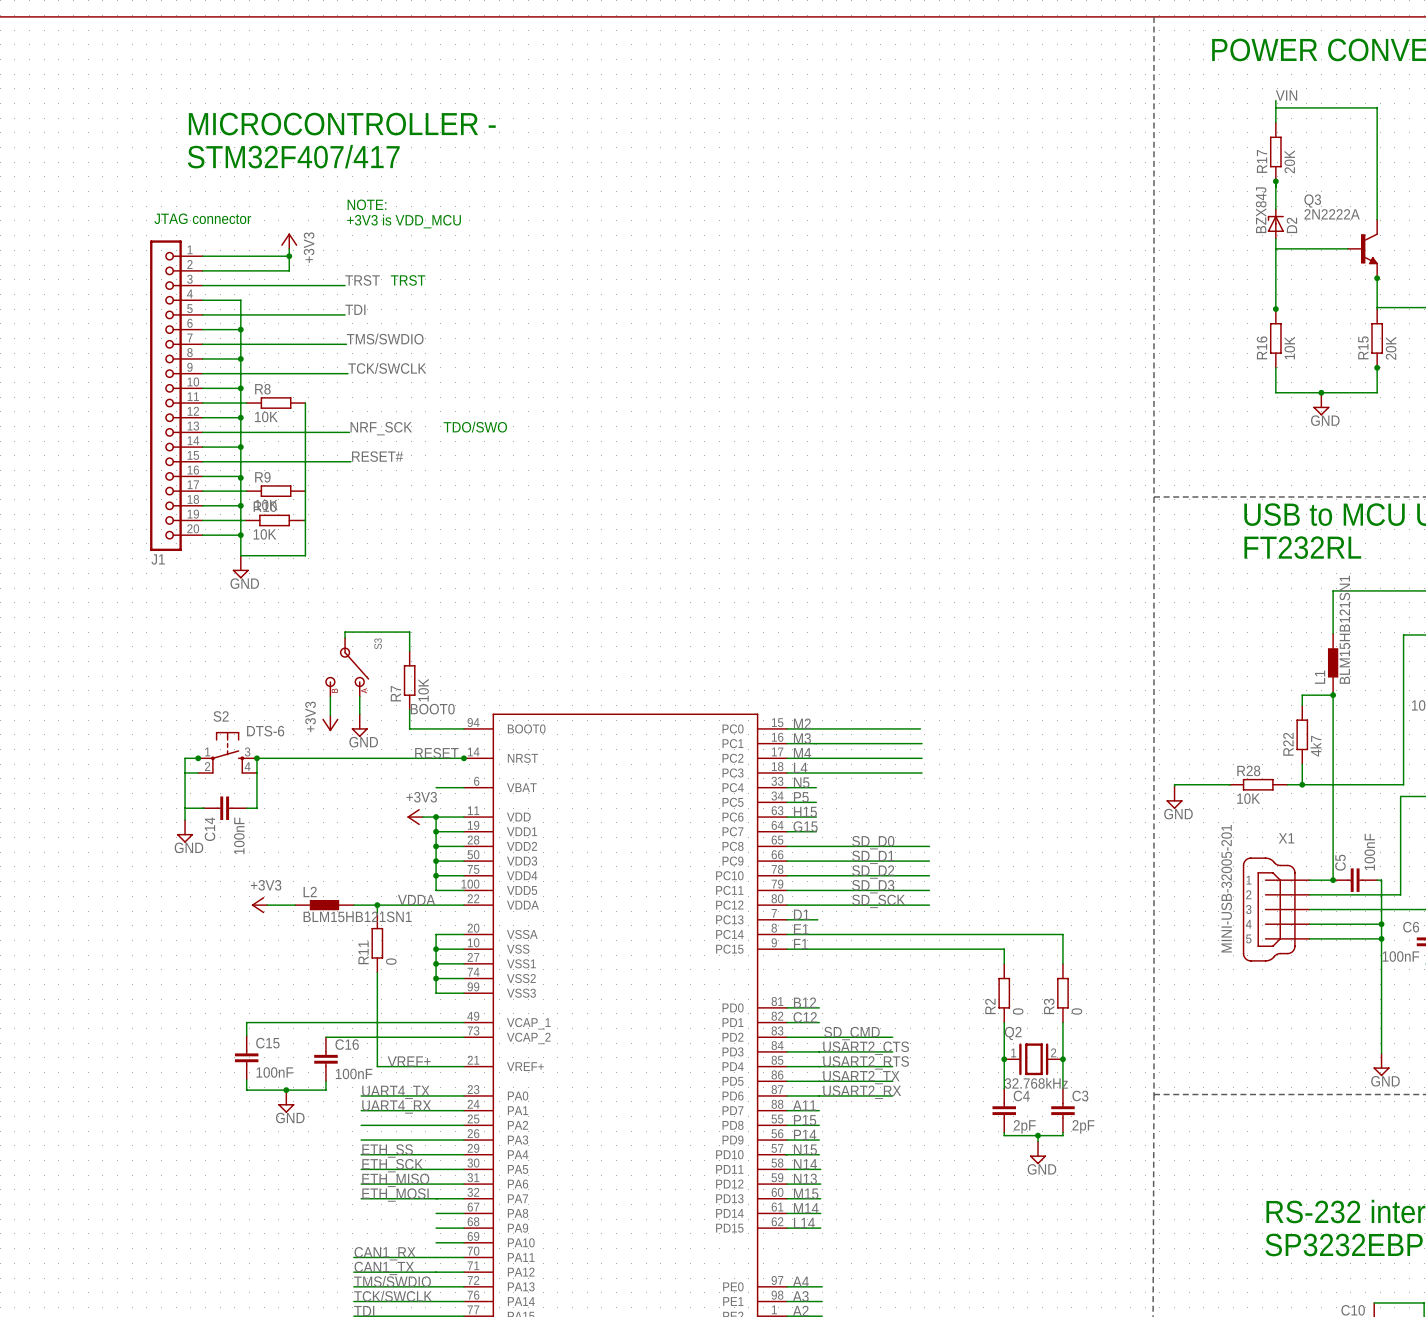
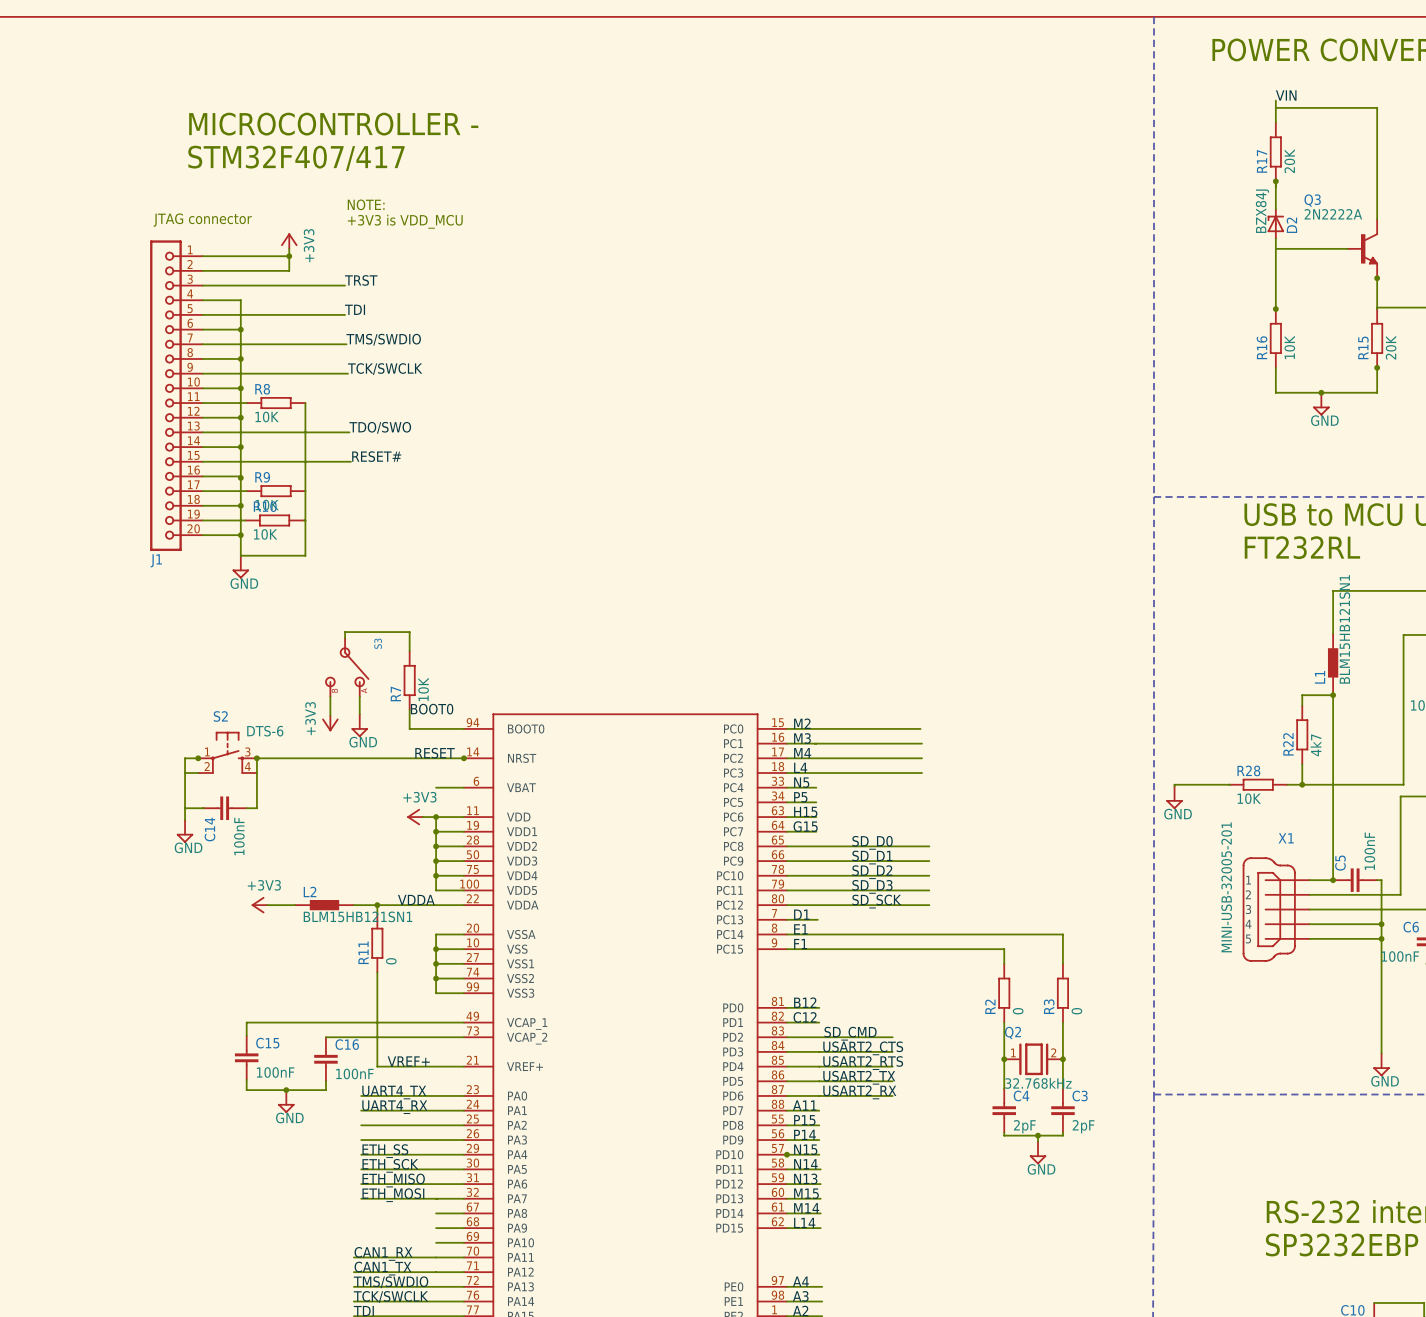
text: TRST (408, 280) -> none
text: TDO/SWO (475, 427) -> none
label: NRF_SCK (381, 428) -> TDO/SWO (380, 427)
junction: none -> (786, 1154)

